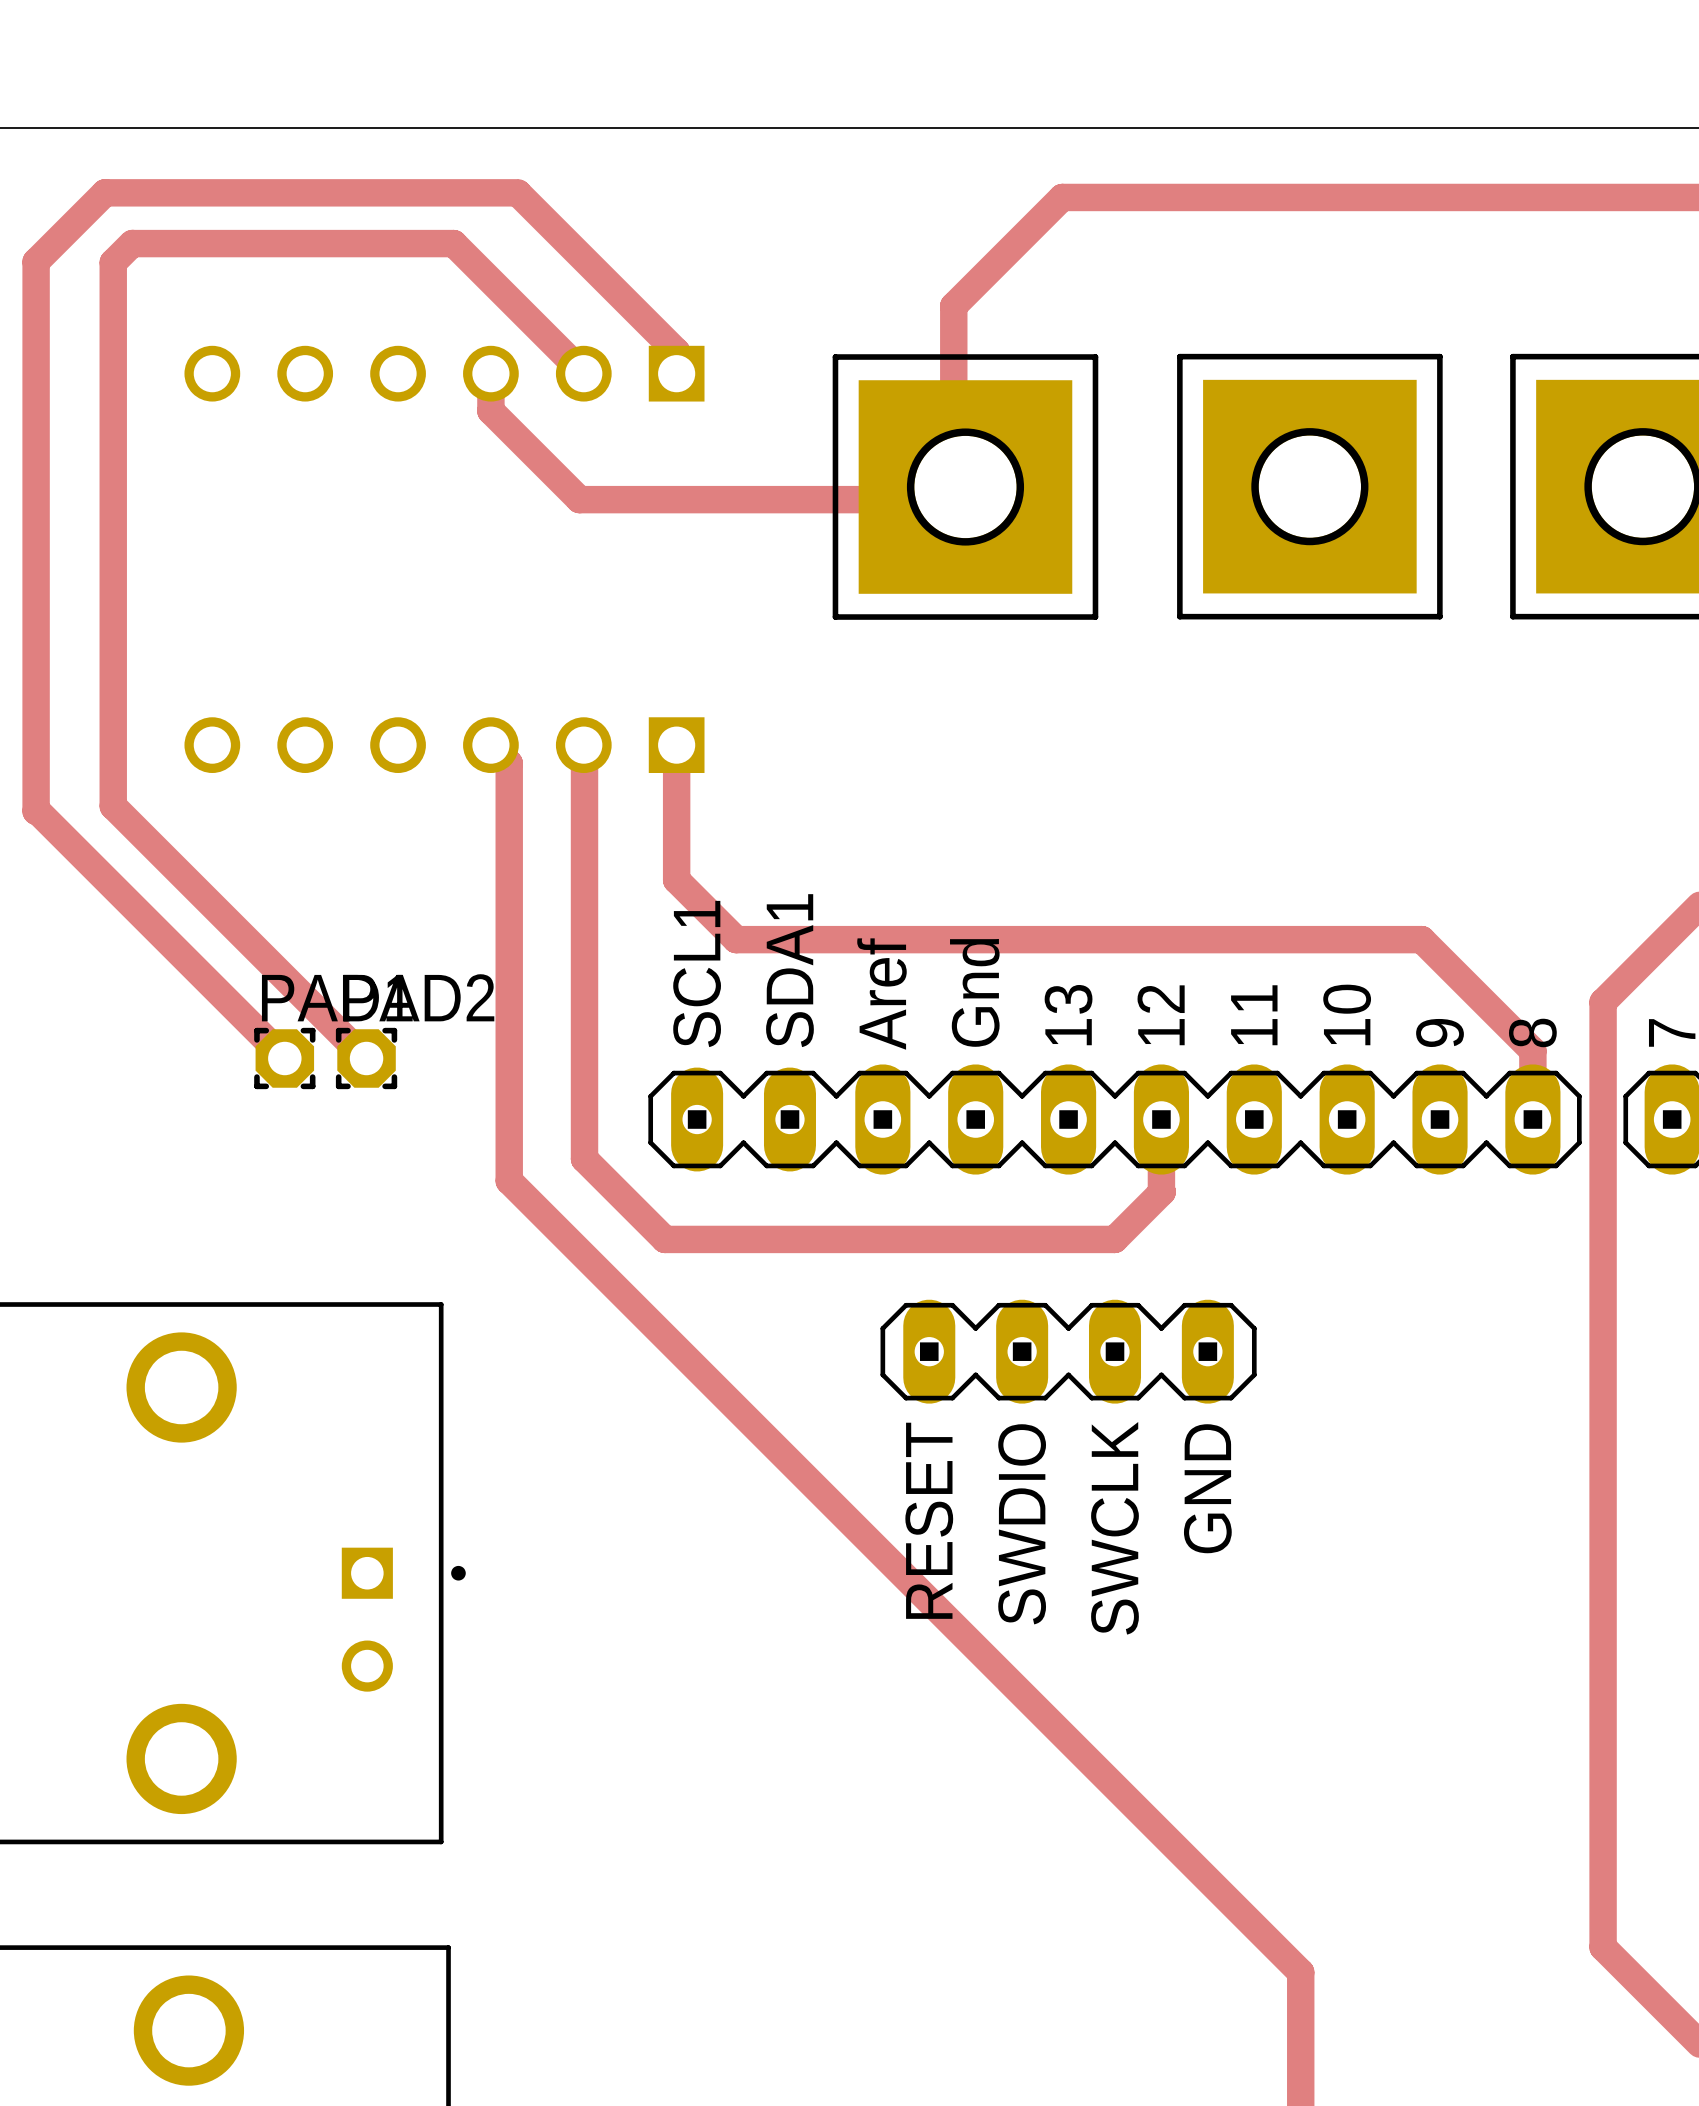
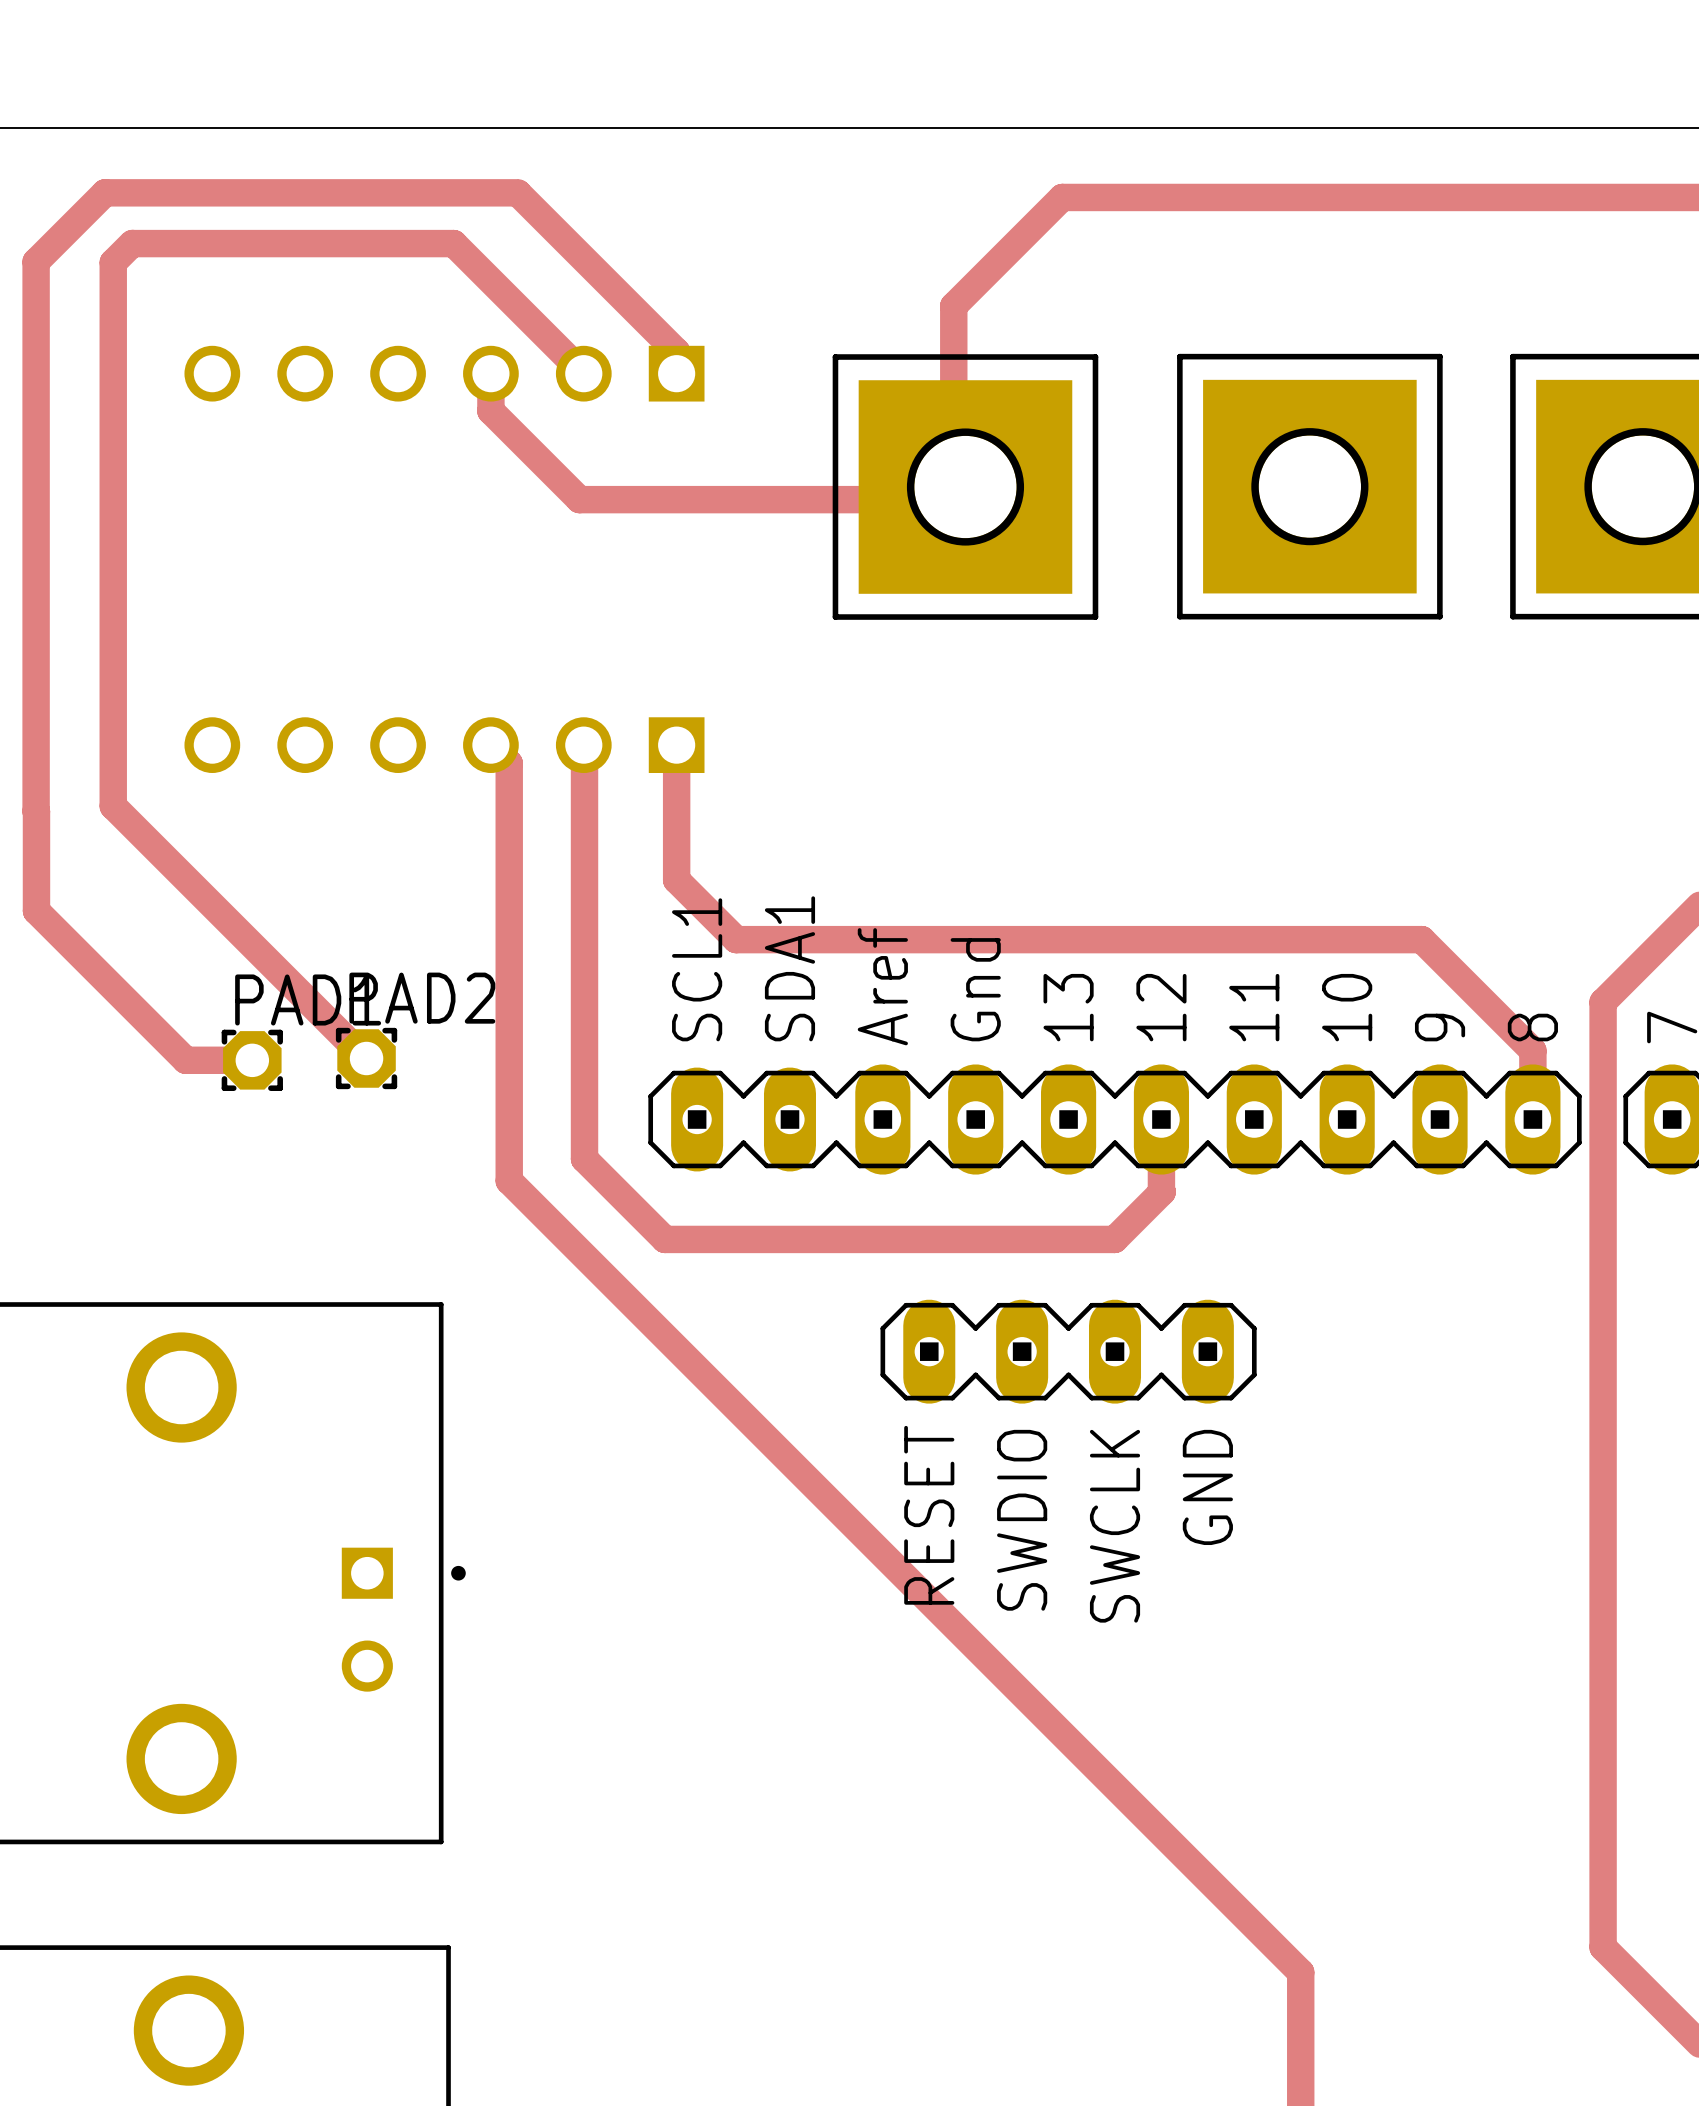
track: (36, 811) (285, 1059) -> (36, 811) (36, 910) (185, 1060) (250, 1060)
PAD1 position: (284, 1058) -> (252, 1060)

